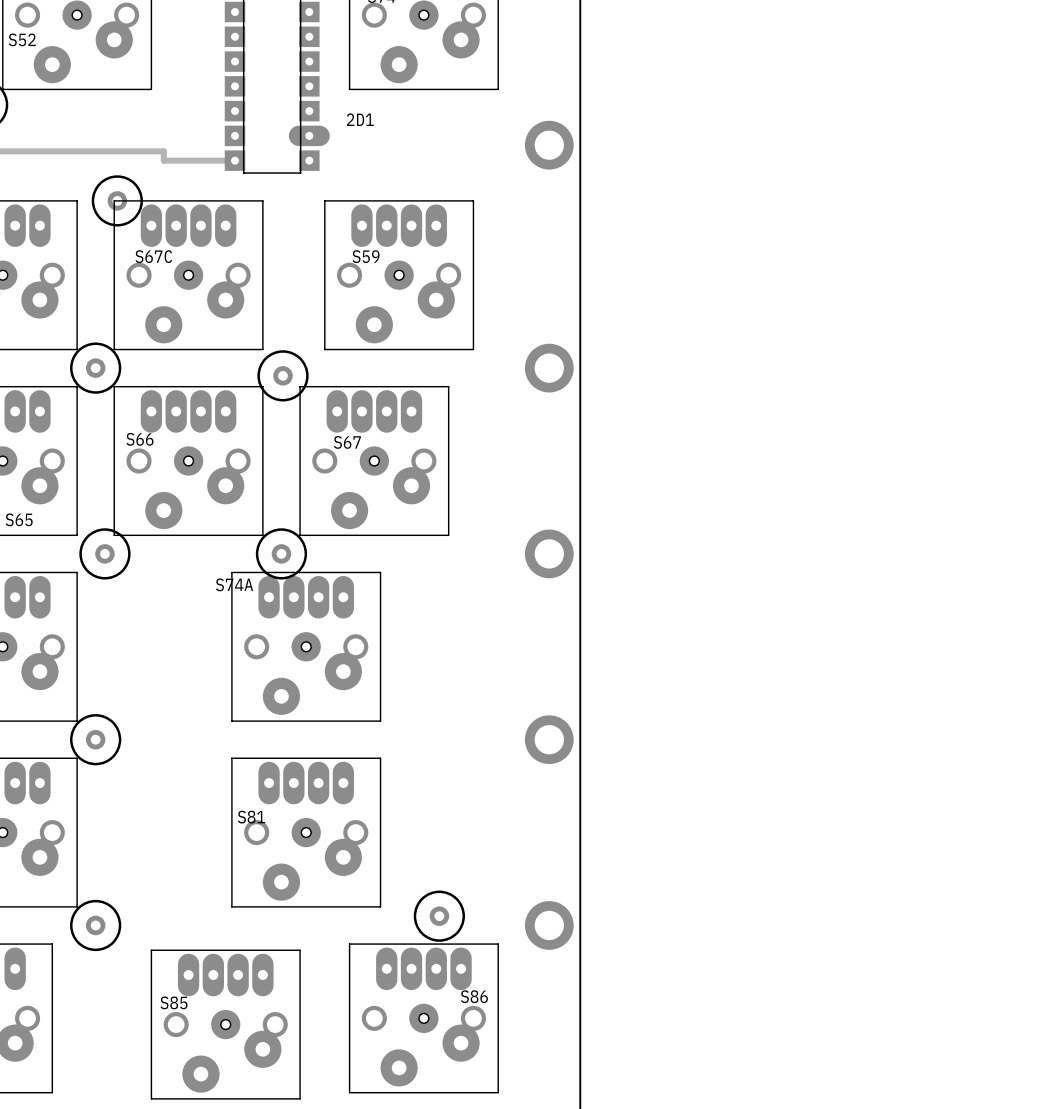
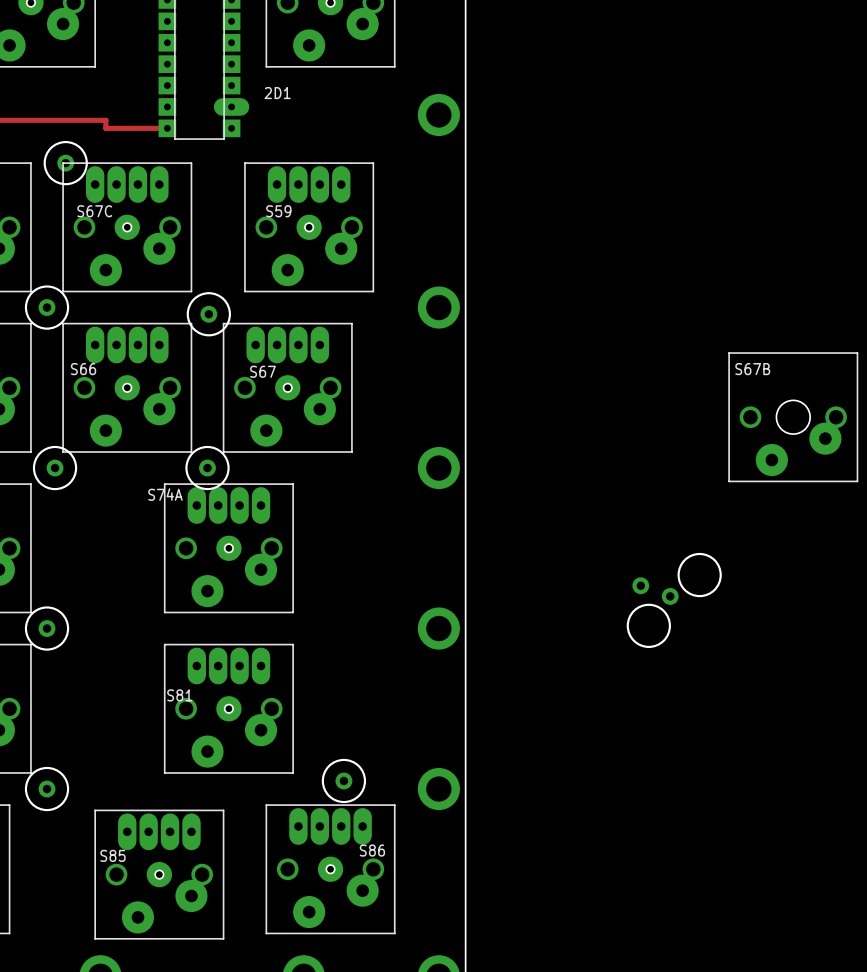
S67B: none -> (793, 417)
round board edge: none -> [677, 552, 722, 598]
via: none -> (640, 585)
via: none -> (670, 596)
round board edge: none -> [626, 603, 671, 648]

